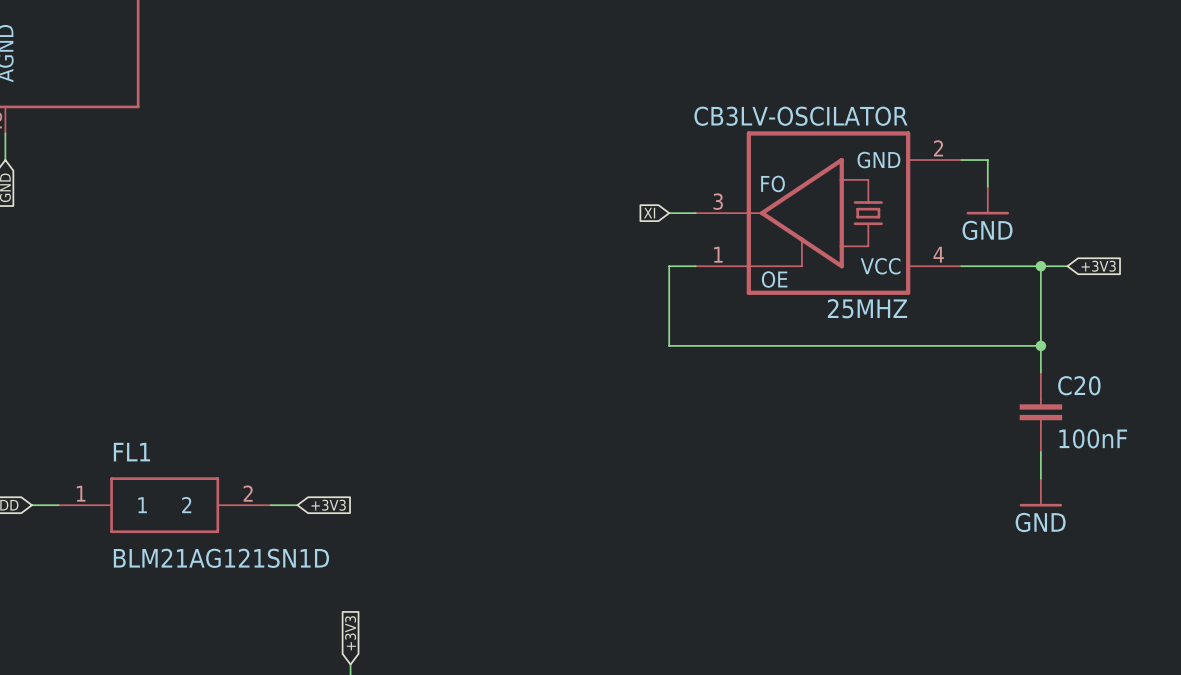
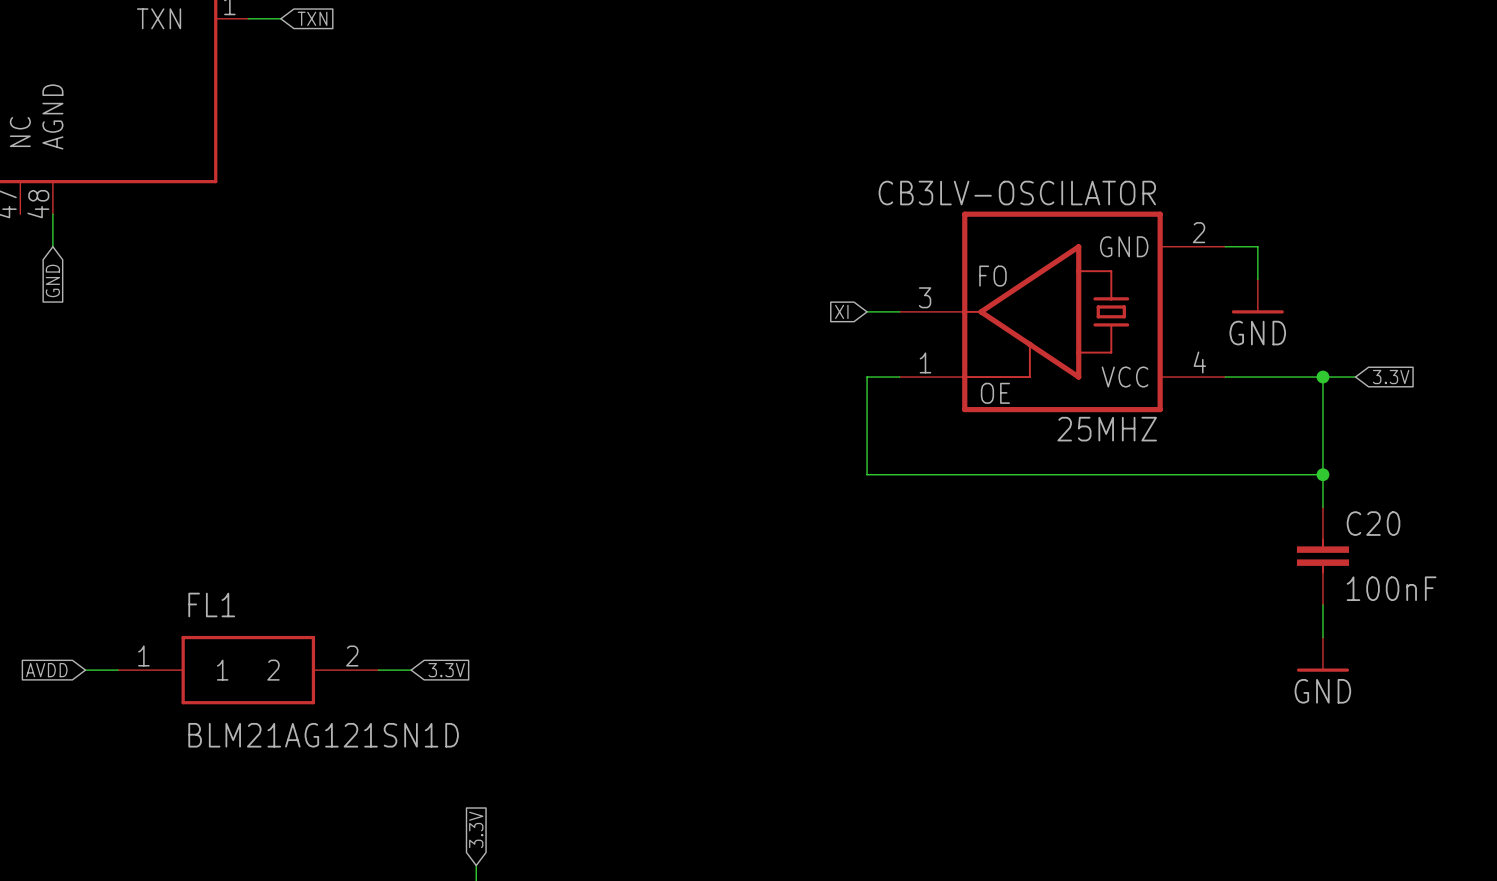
global label: +3V3 (1098, 266) -> 3.3V (1391, 377)
global label: +3V3 (328, 505) -> 3.3V (446, 670)
global label: +3V3 (350, 633) -> 3.3V (476, 829)

